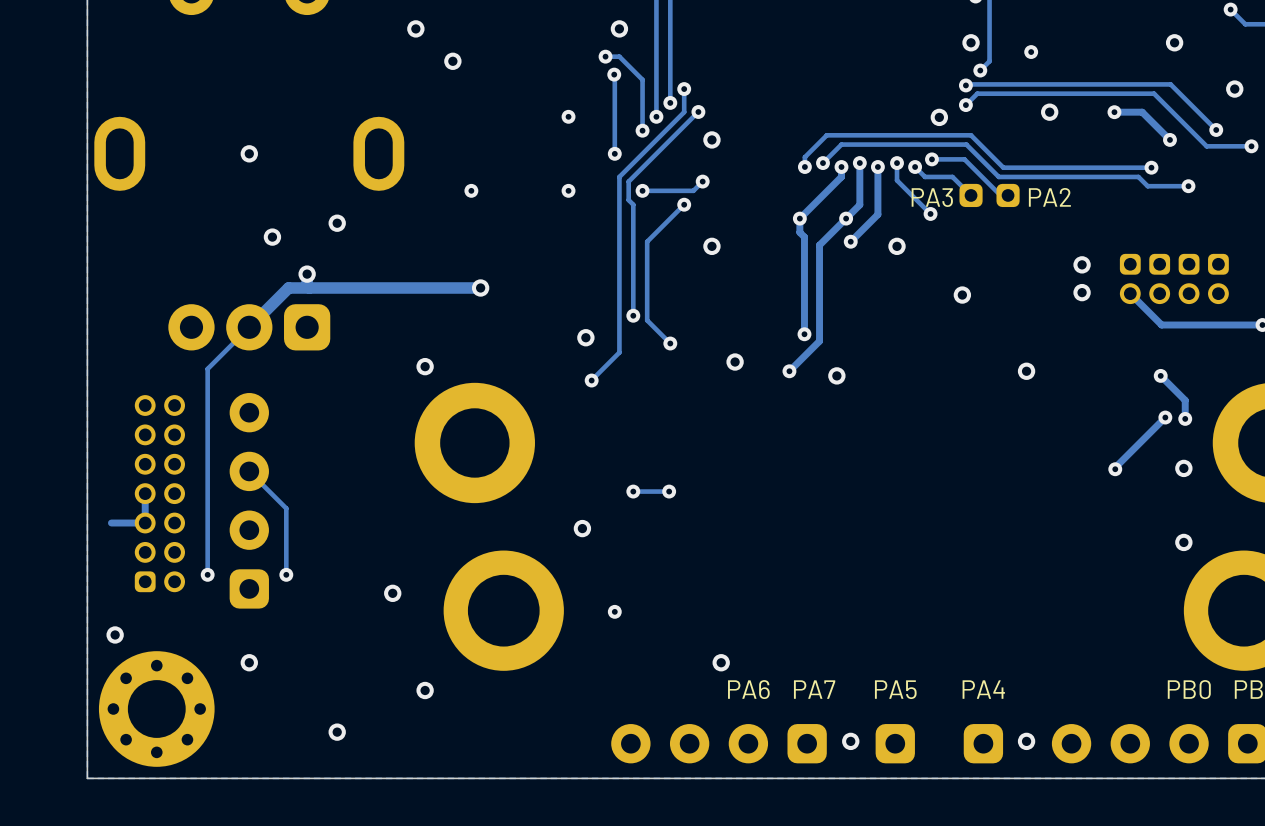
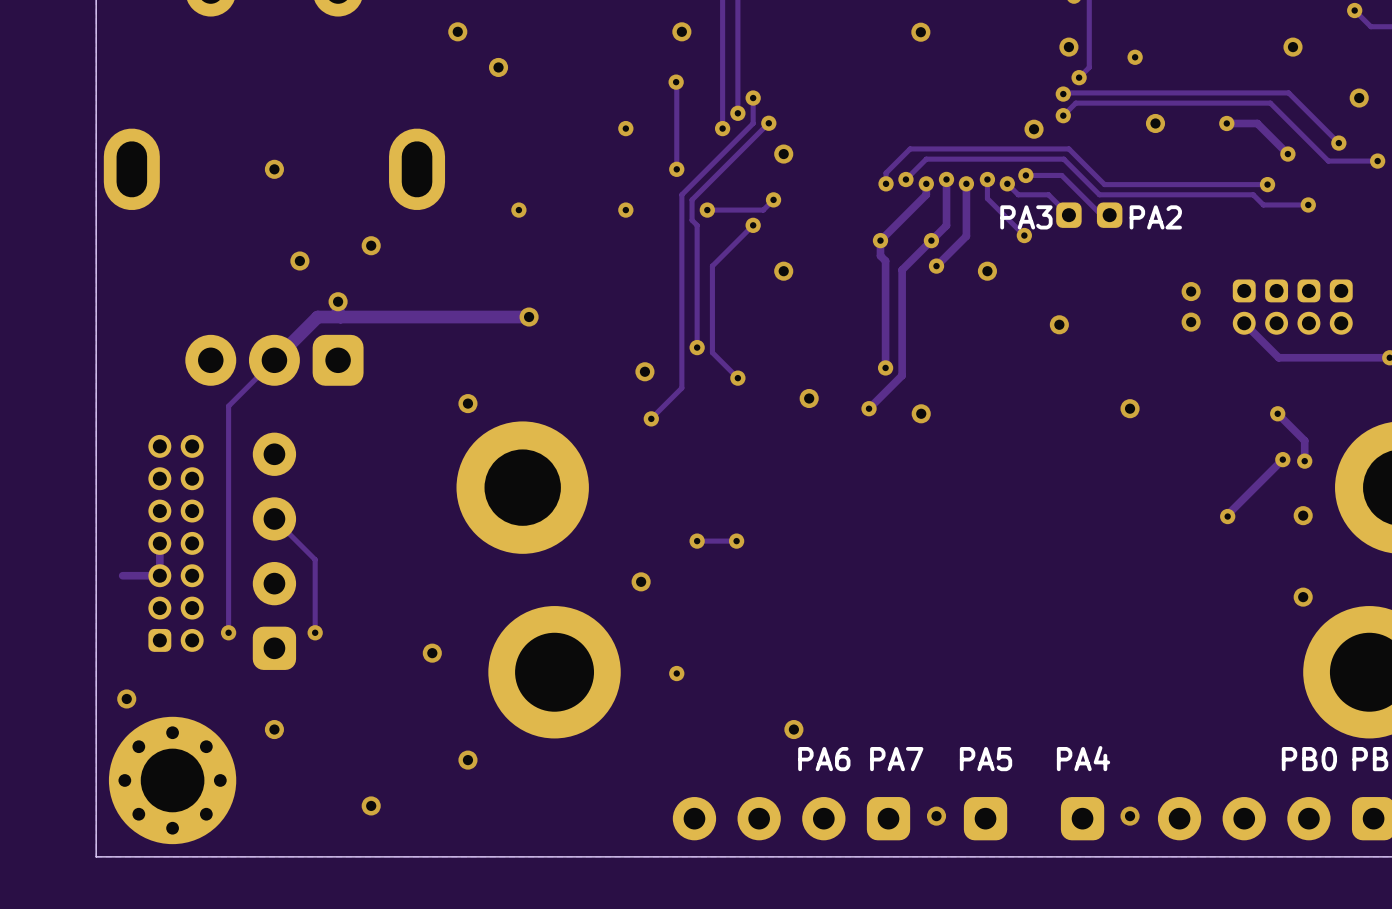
via: none -> (920, 32)
track: (605, 56) (619, 56) (642, 79) (642, 130) -> none
via: (605, 56) -> none
via: (642, 130) -> none

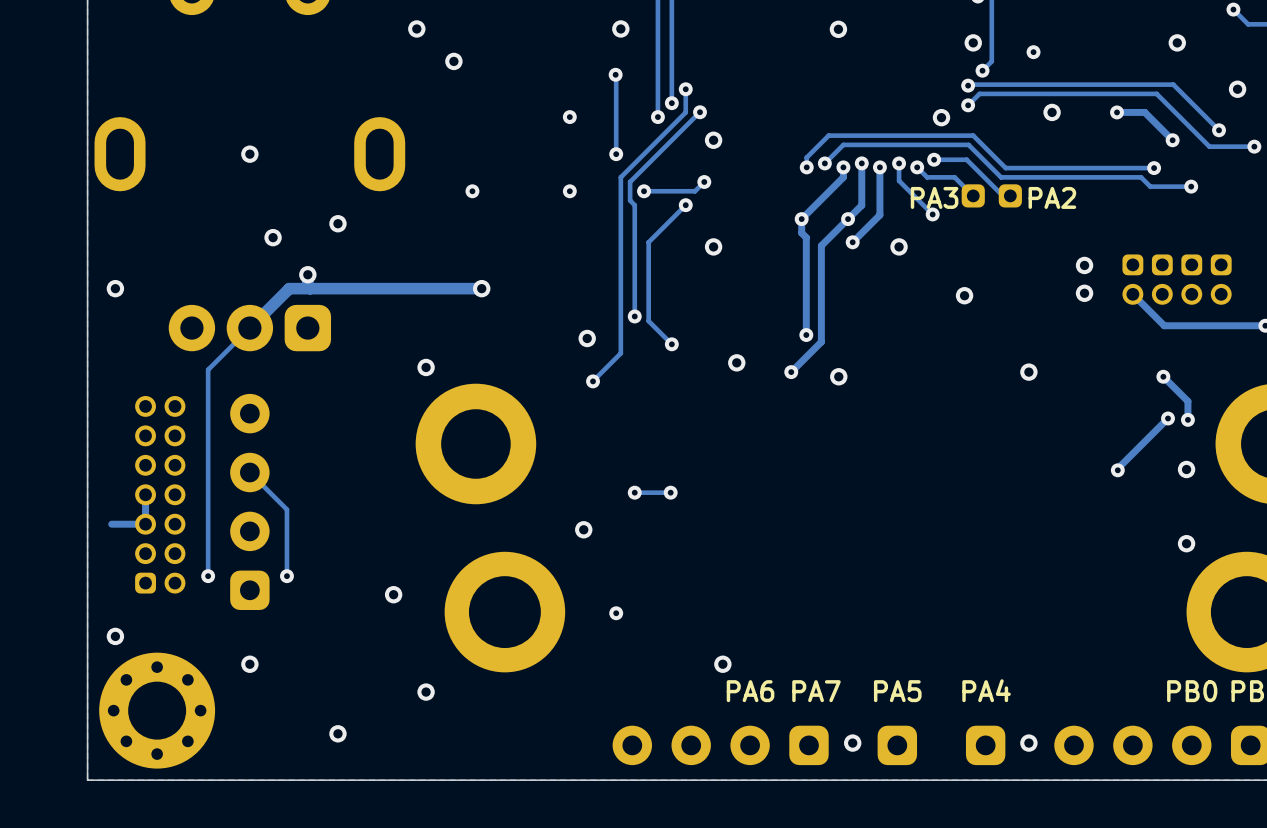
via: none -> (115, 288)

